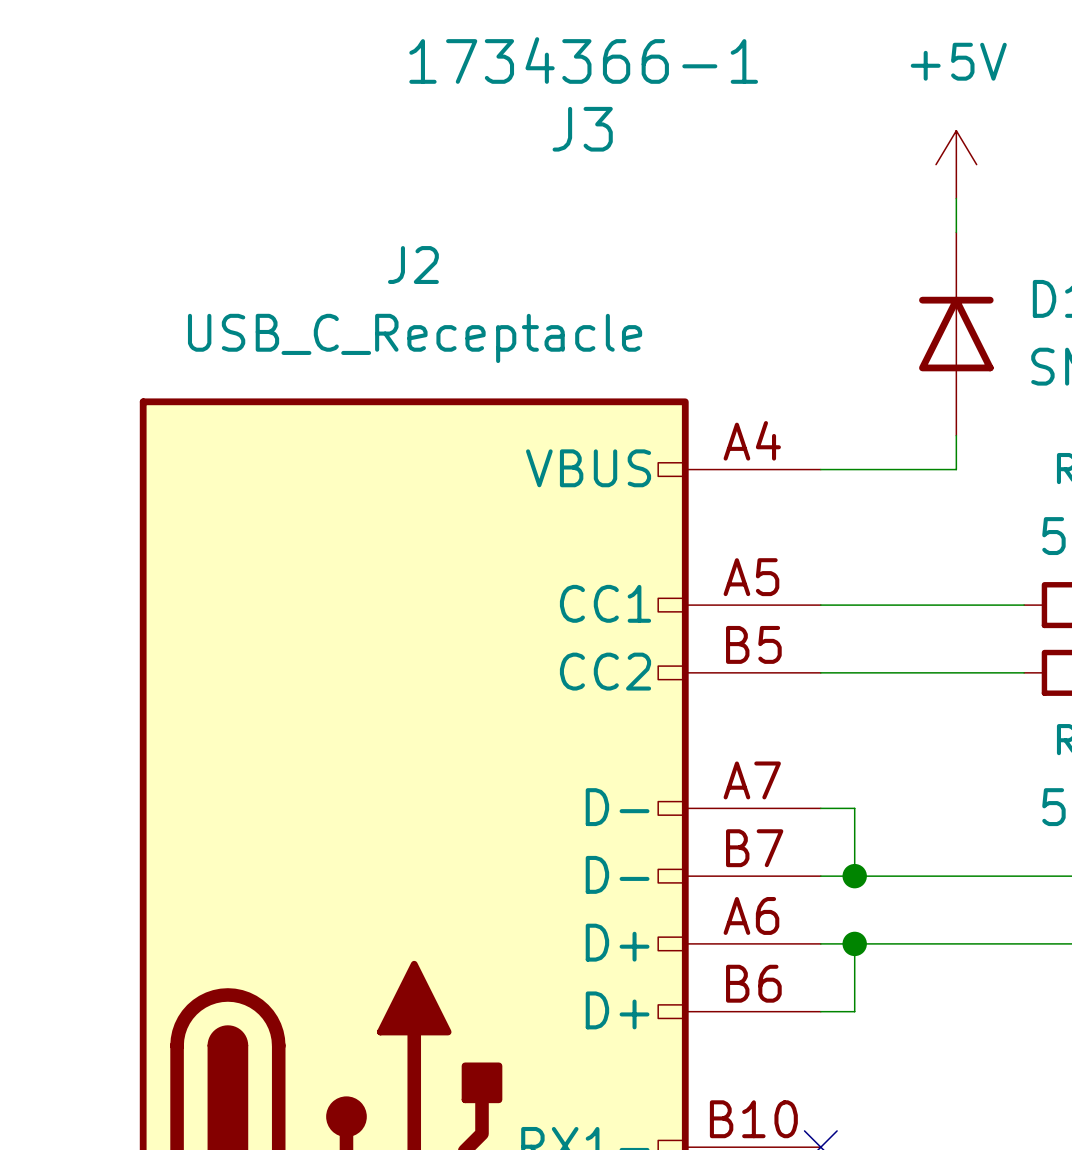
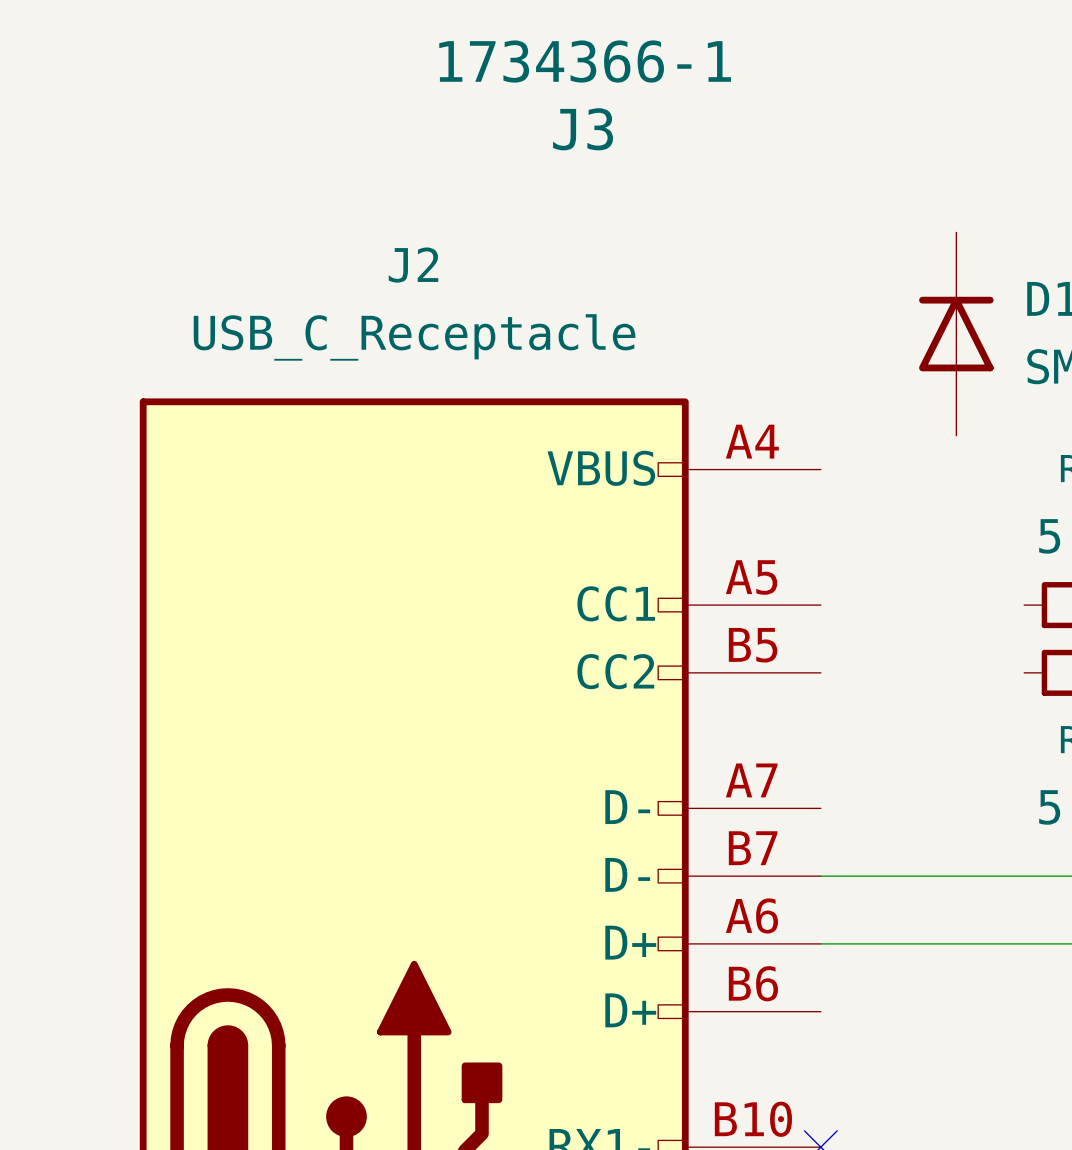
power symbol: +5V (956, 164) -> none
wire: (956, 198) (956, 232) -> none
wire: (956, 435) (956, 469) (820, 469) -> none
wire: (820, 605) (1024, 605) -> none
wire: (820, 672) (1024, 672) -> none
wire: (820, 808) (854, 808) (854, 876) -> none
junction: (854, 876) -> none
wire: (854, 943) (854, 1011) (820, 1011) -> none
junction: (854, 943) -> none

